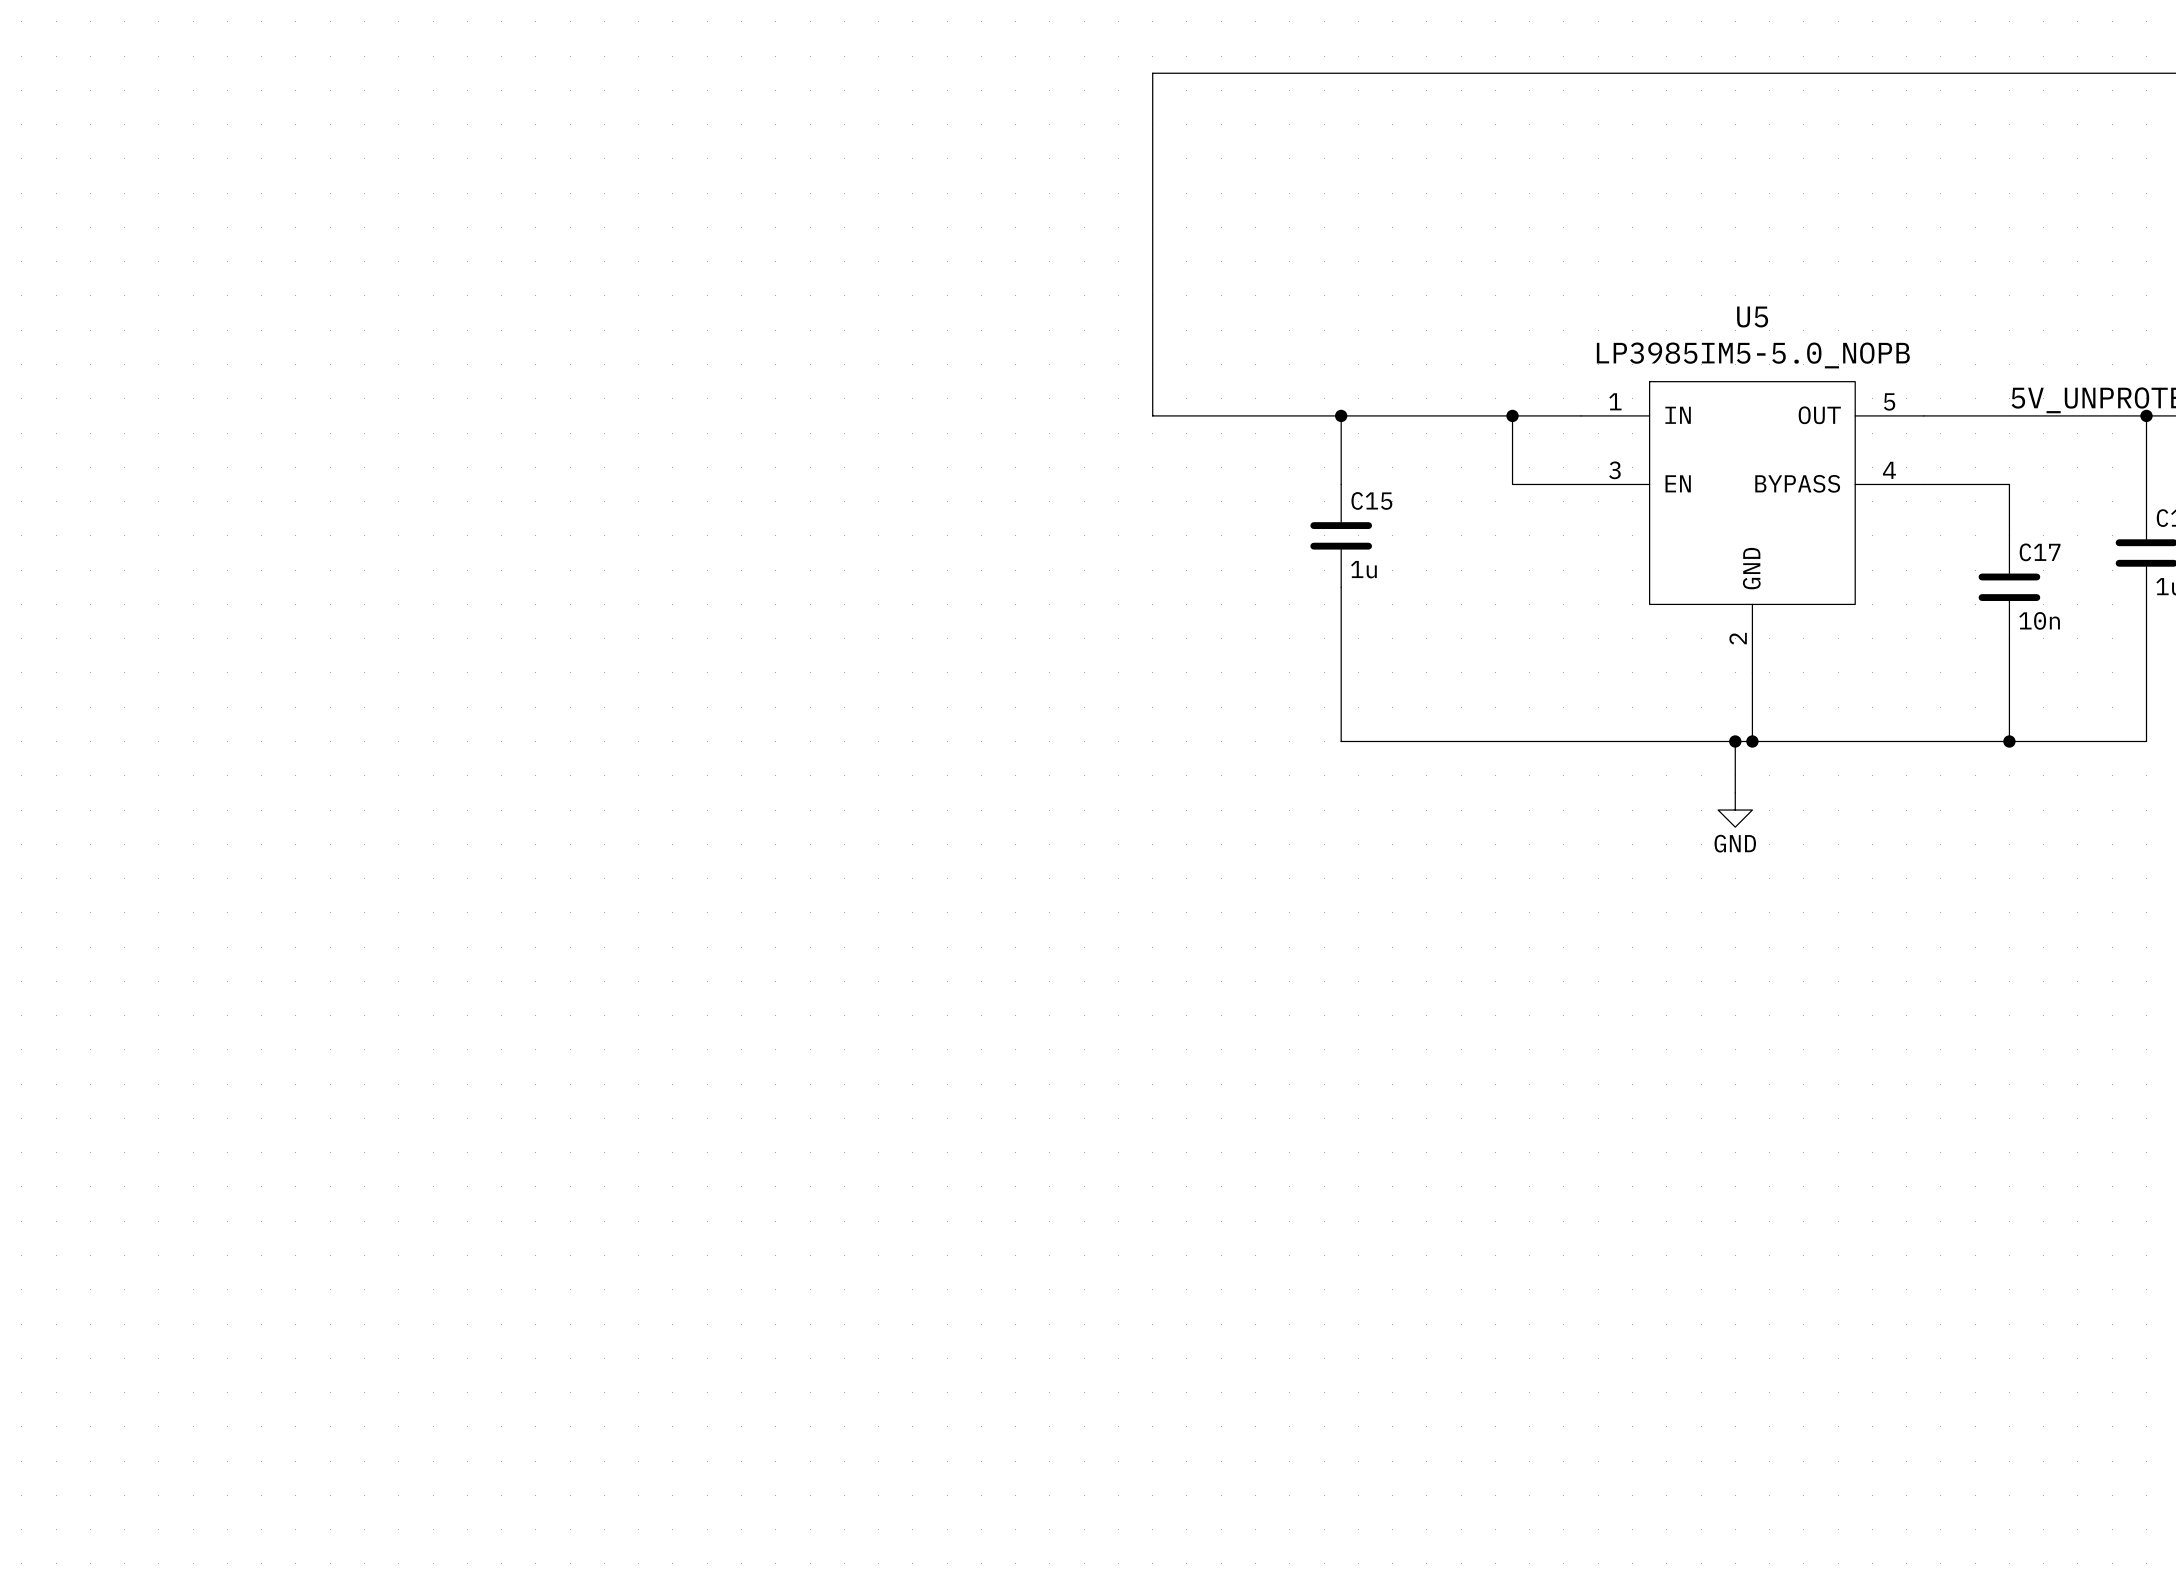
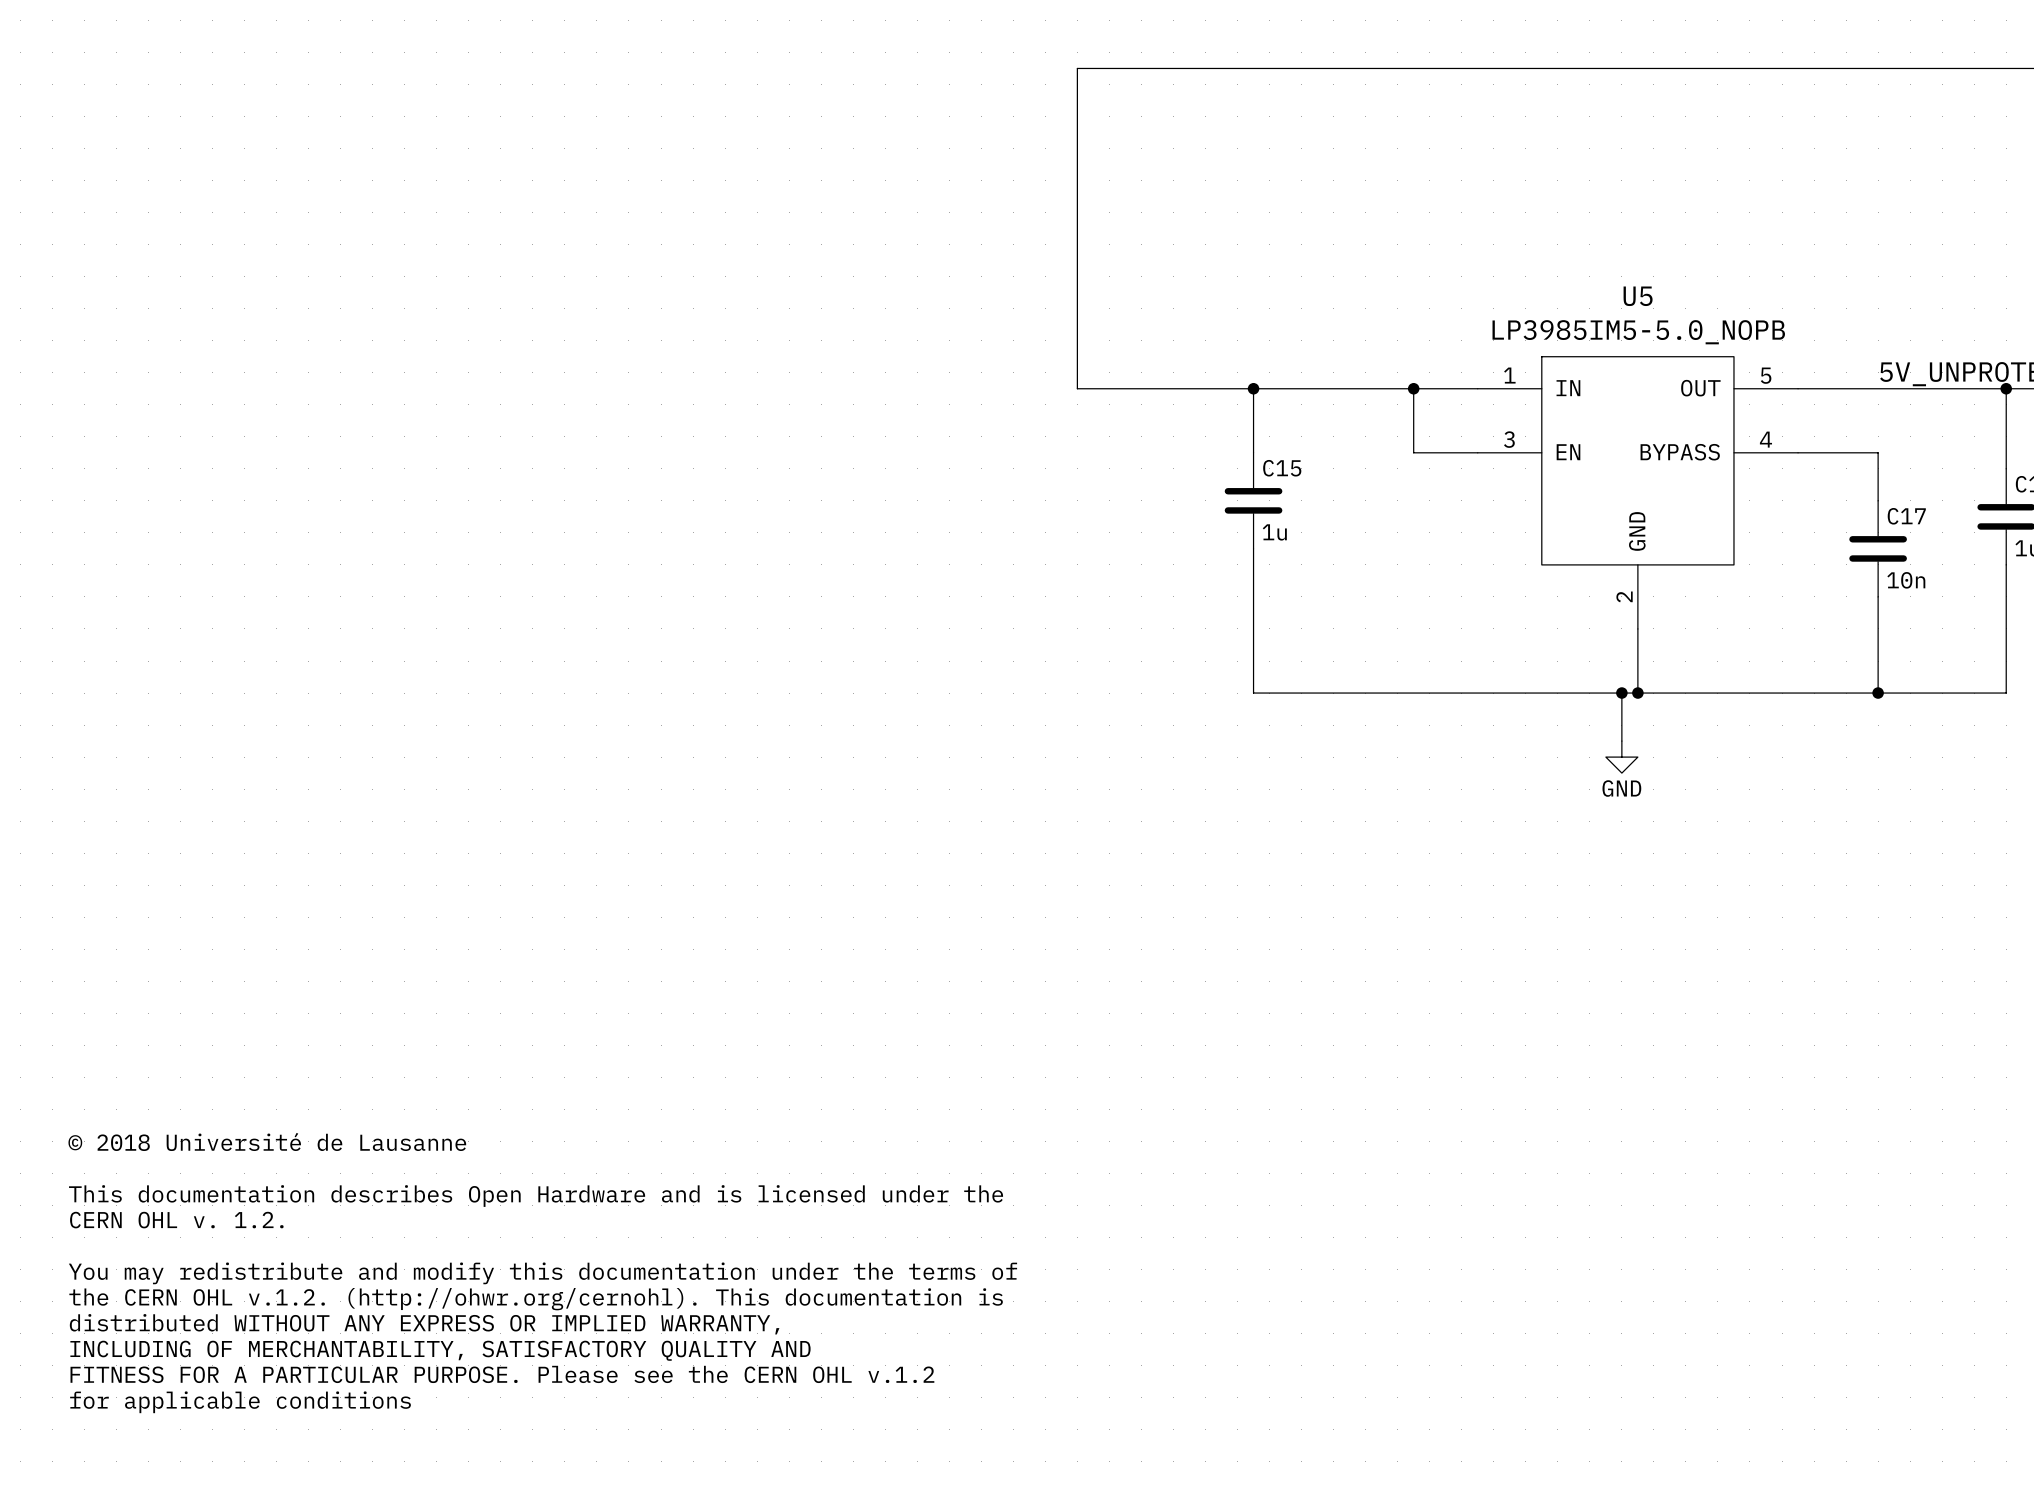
text: none -> © 2018 Université de Lausanne (267, 1141)
text: none -> This documentation describes Open Hardware and is licensed under the (536, 1196)
text: none -> CERN OHL v. 1.2. (176, 1220)
text: none -> You may redistribute and modify this documentation under the terms of (542, 1273)
text: none -> the CERN OHL v.1.2. (http://ohwr.org/cernohl). This documentation is (536, 1299)
text: none -> distributed WITHOUT ANY EXPRESS OR IMPLIED WARRANTY, (424, 1324)
text: none -> INCLUDING OF MERCHANTABILITY, SATISFACTORY QUALITY AND (440, 1350)
text: none -> FITNESS FOR A PARTICULAR PURPOSE. Please see the CERN OHL v.1.2 (502, 1374)
text: none -> for applicable conditions (240, 1402)

